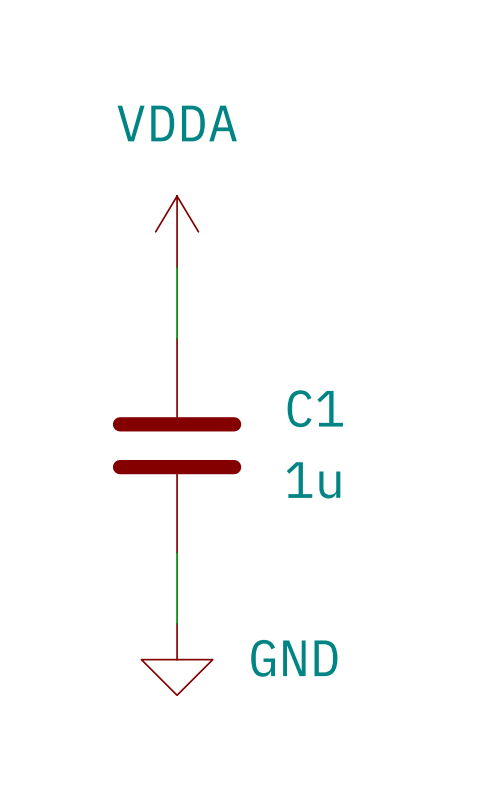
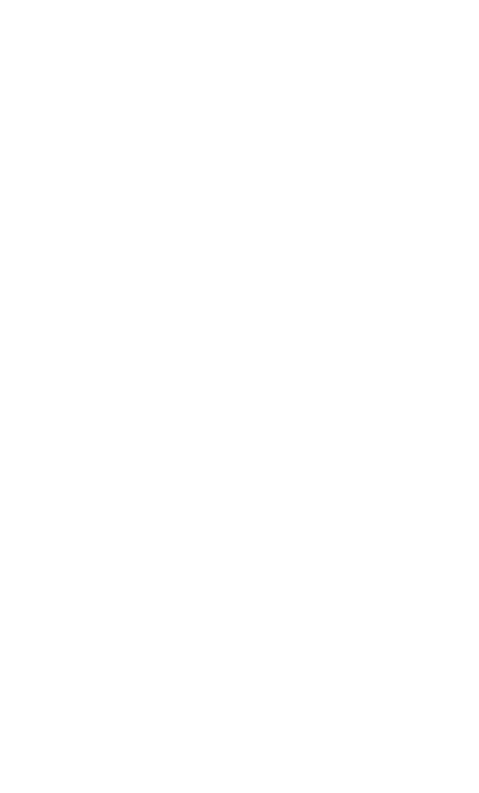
power symbol: VDDA (177, 231) -> none
wire: (177, 267) (177, 338) -> none
C1: 1u (177, 445) -> none
wire: (177, 552) (177, 623) -> none
power symbol: GND (177, 659) -> none

